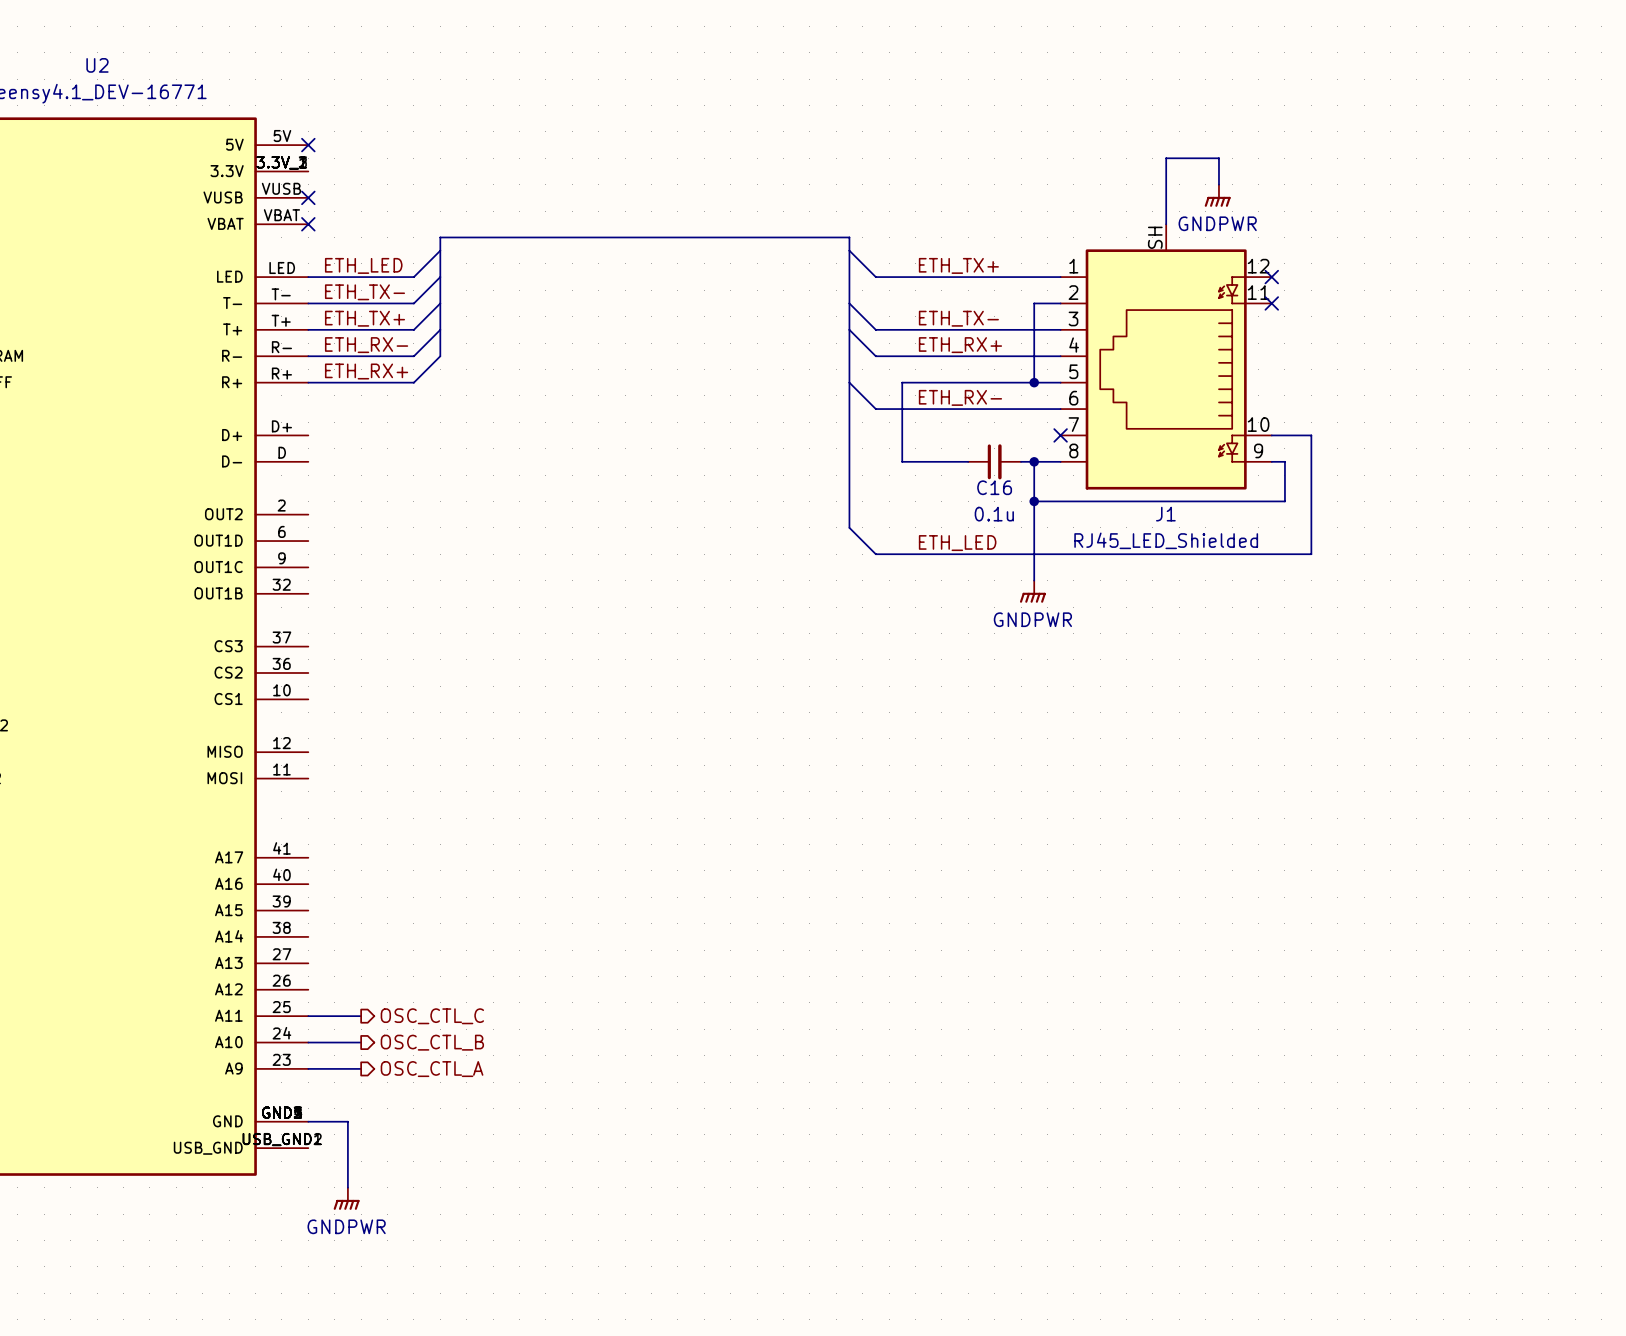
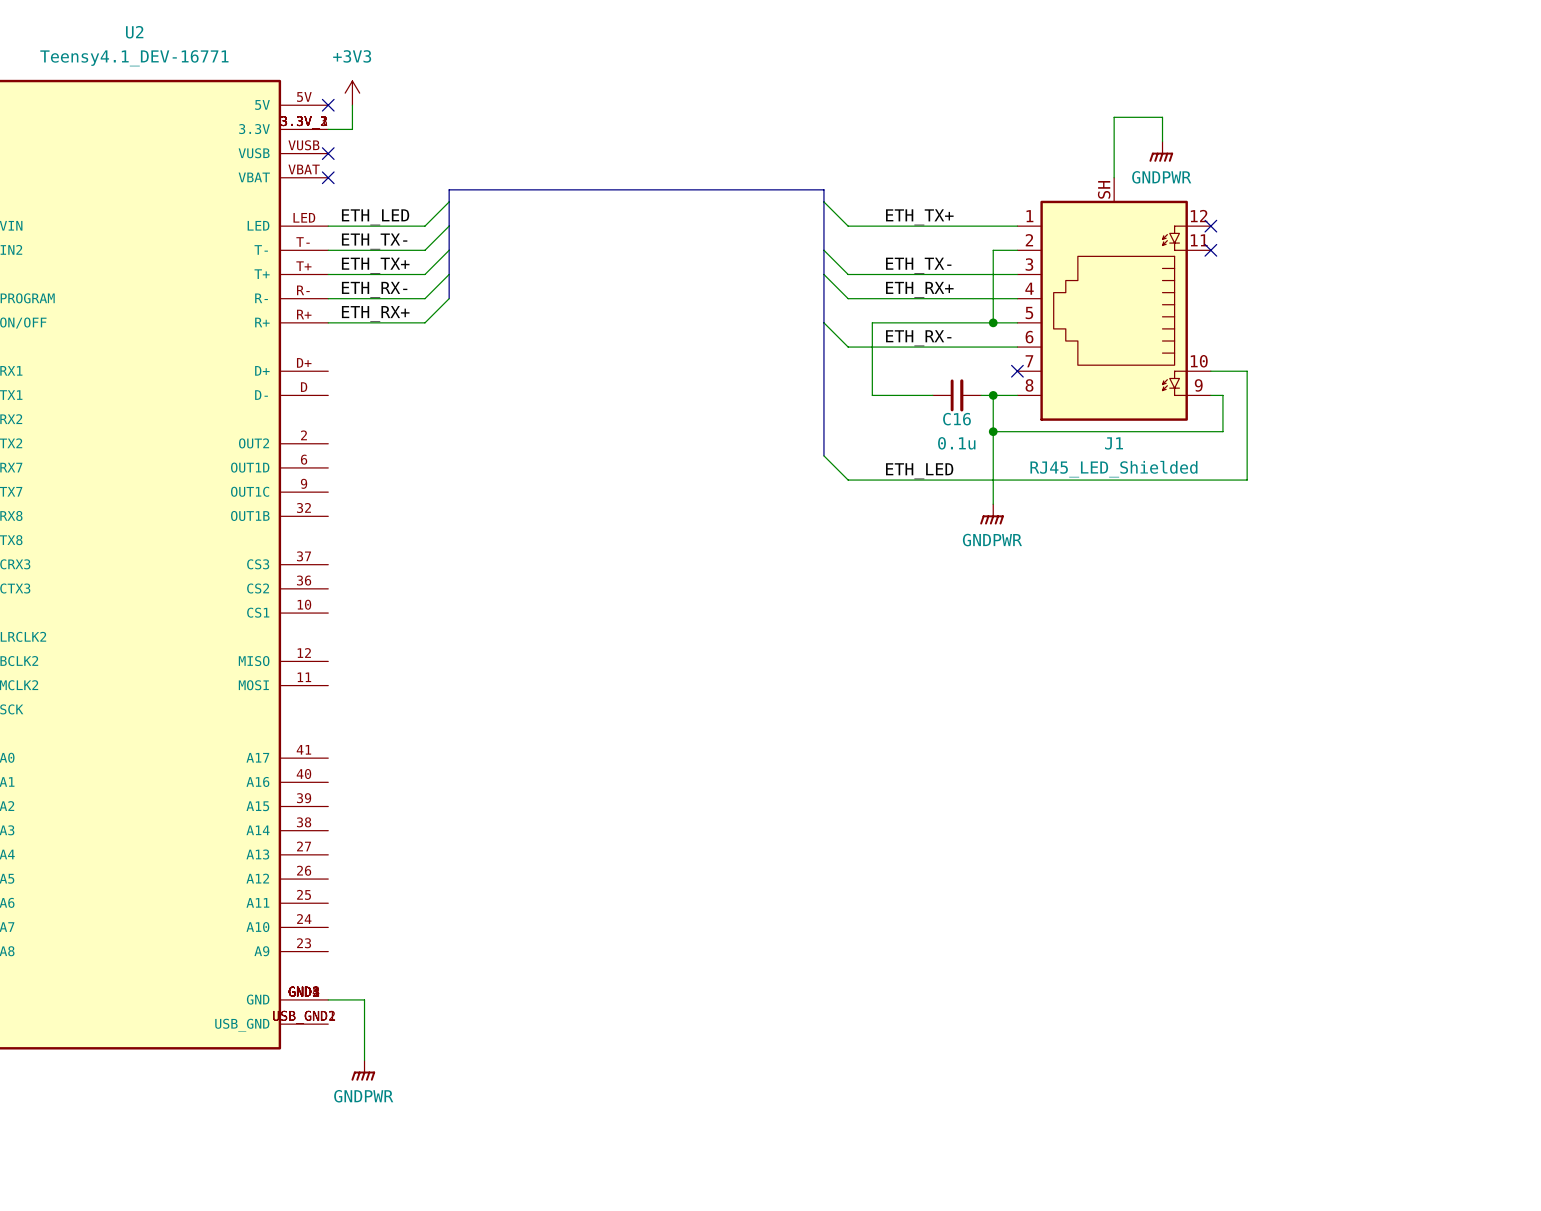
power symbol: none -> +3V3 (352, 93)
wire: none -> (352, 105) (352, 129) (328, 129)
wire: (308, 1016) (361, 1016) -> none
hierarchical label: OSC_CTL_C (432, 1016) -> none
wire: (308, 1042) (361, 1042) -> none
hierarchical label: OSC_CTL_B (432, 1042) -> none
wire: (308, 1068) (361, 1068) -> none
hierarchical label: OSC_CTL_A (432, 1069) -> none

